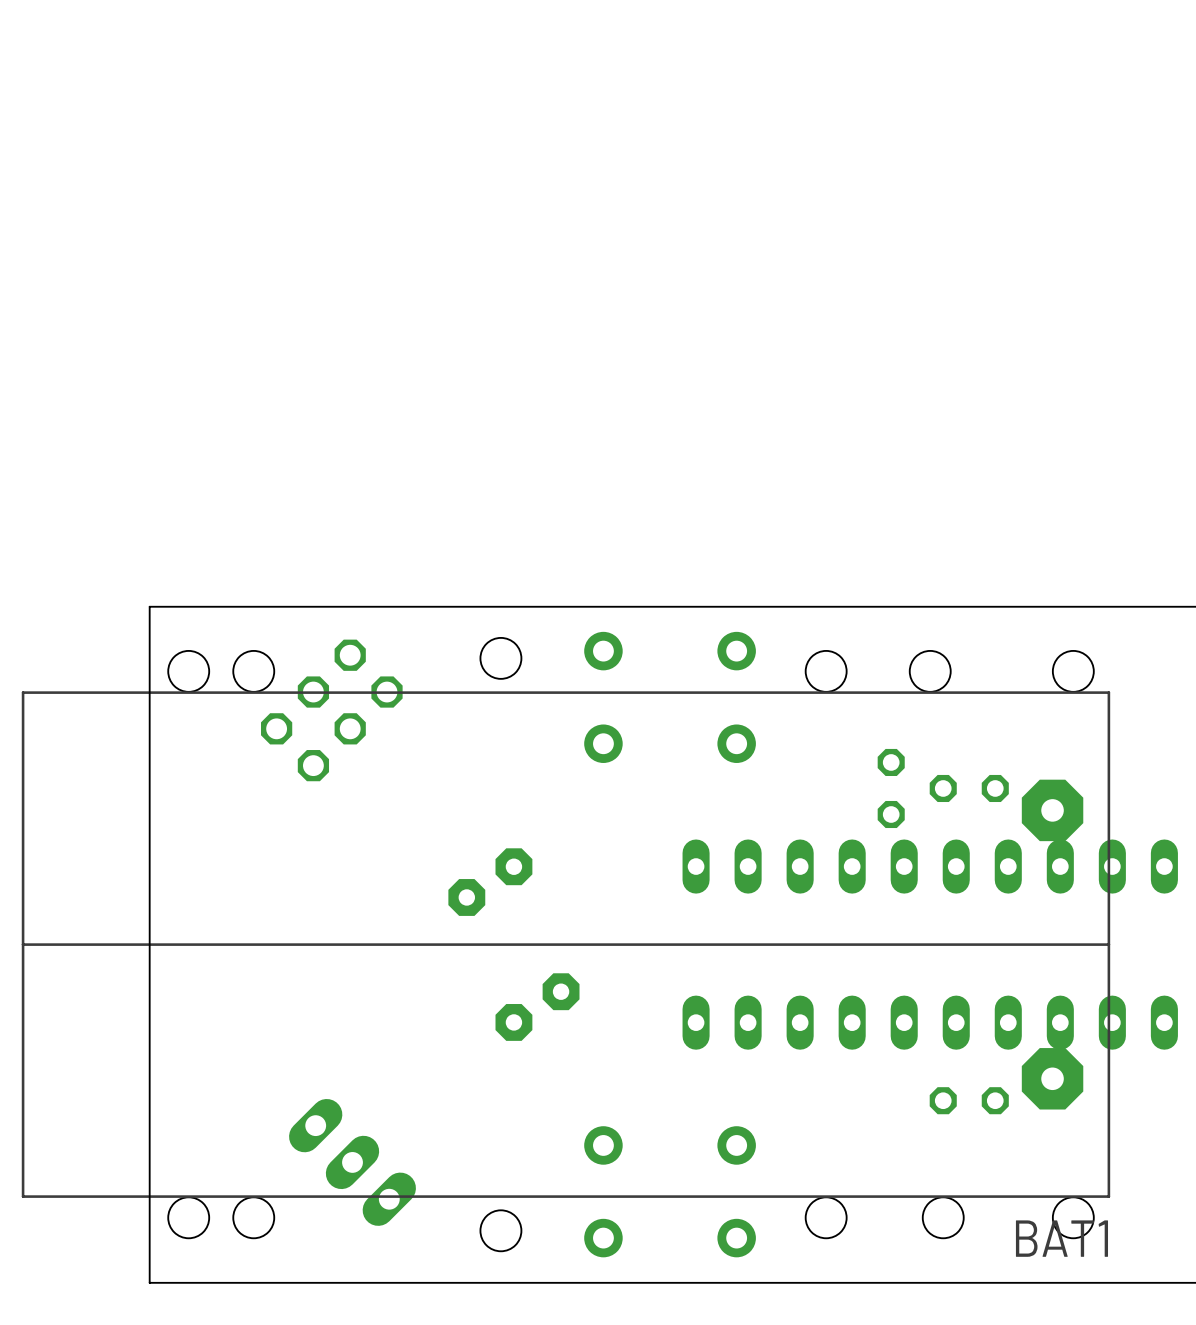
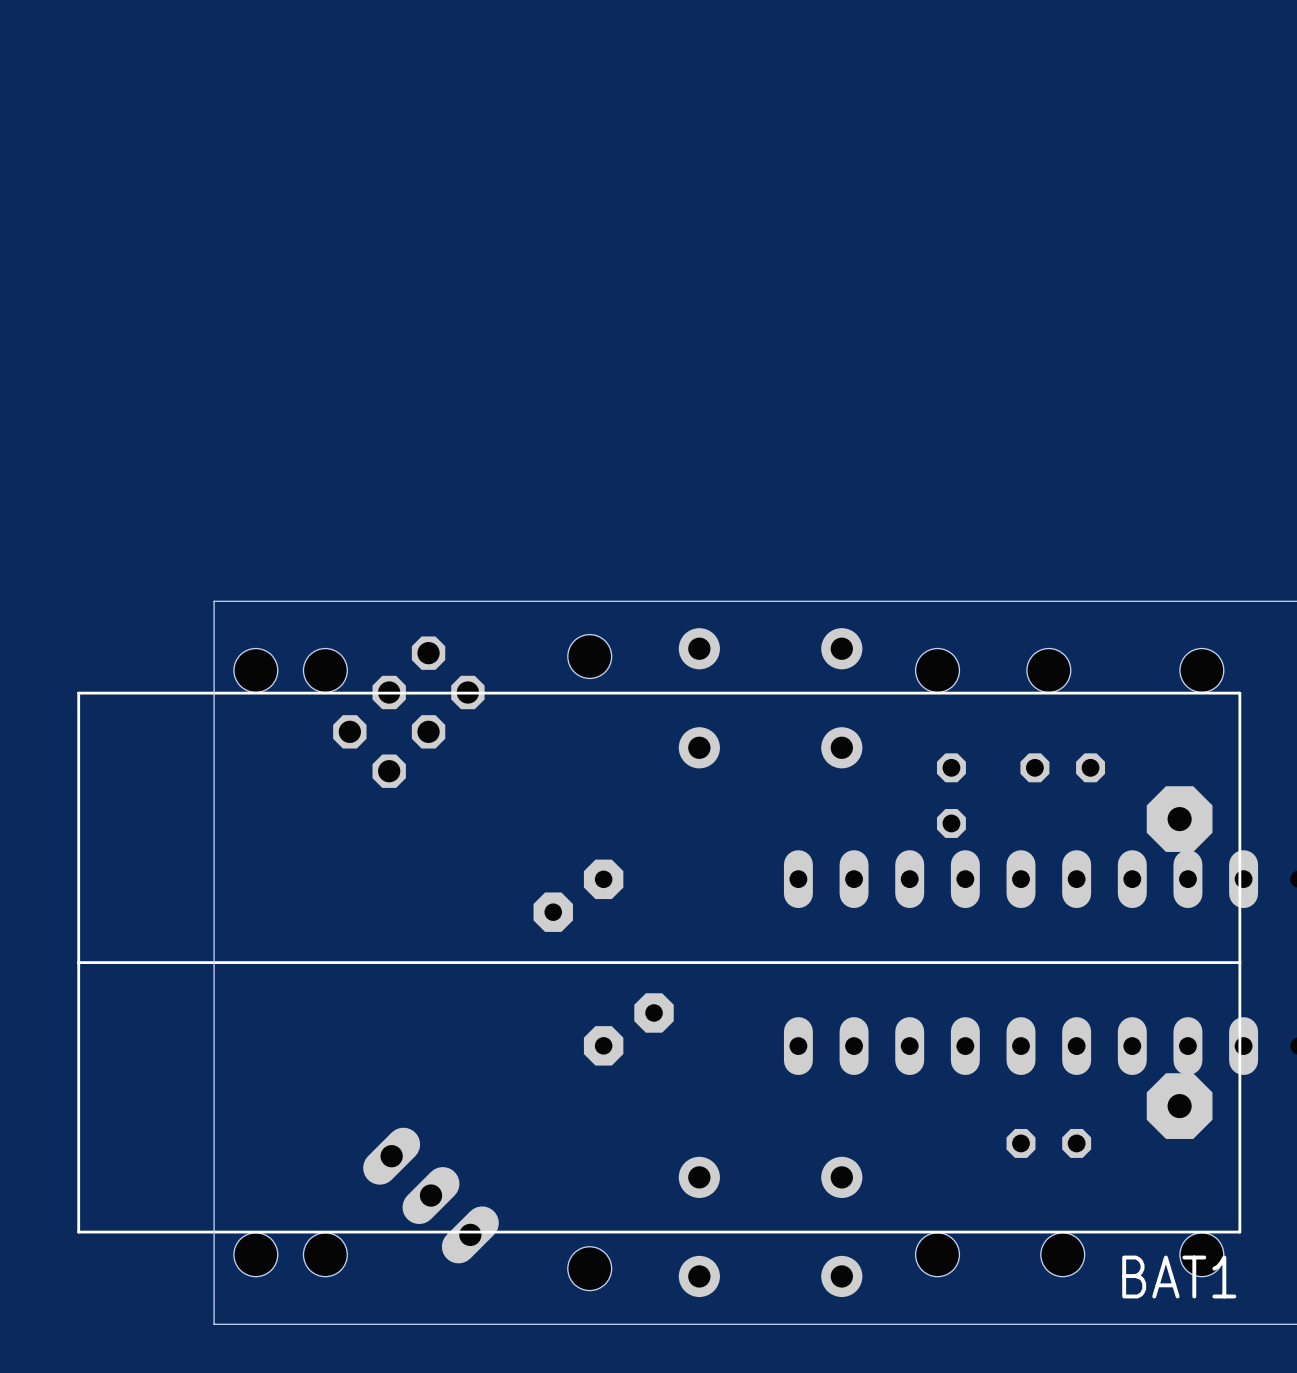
part: none -> (1062, 767)
part: none -> (951, 795)
part: (891, 788) -> none
part: (969, 788) -> none
part position: (969, 1100) -> (1048, 1143)

